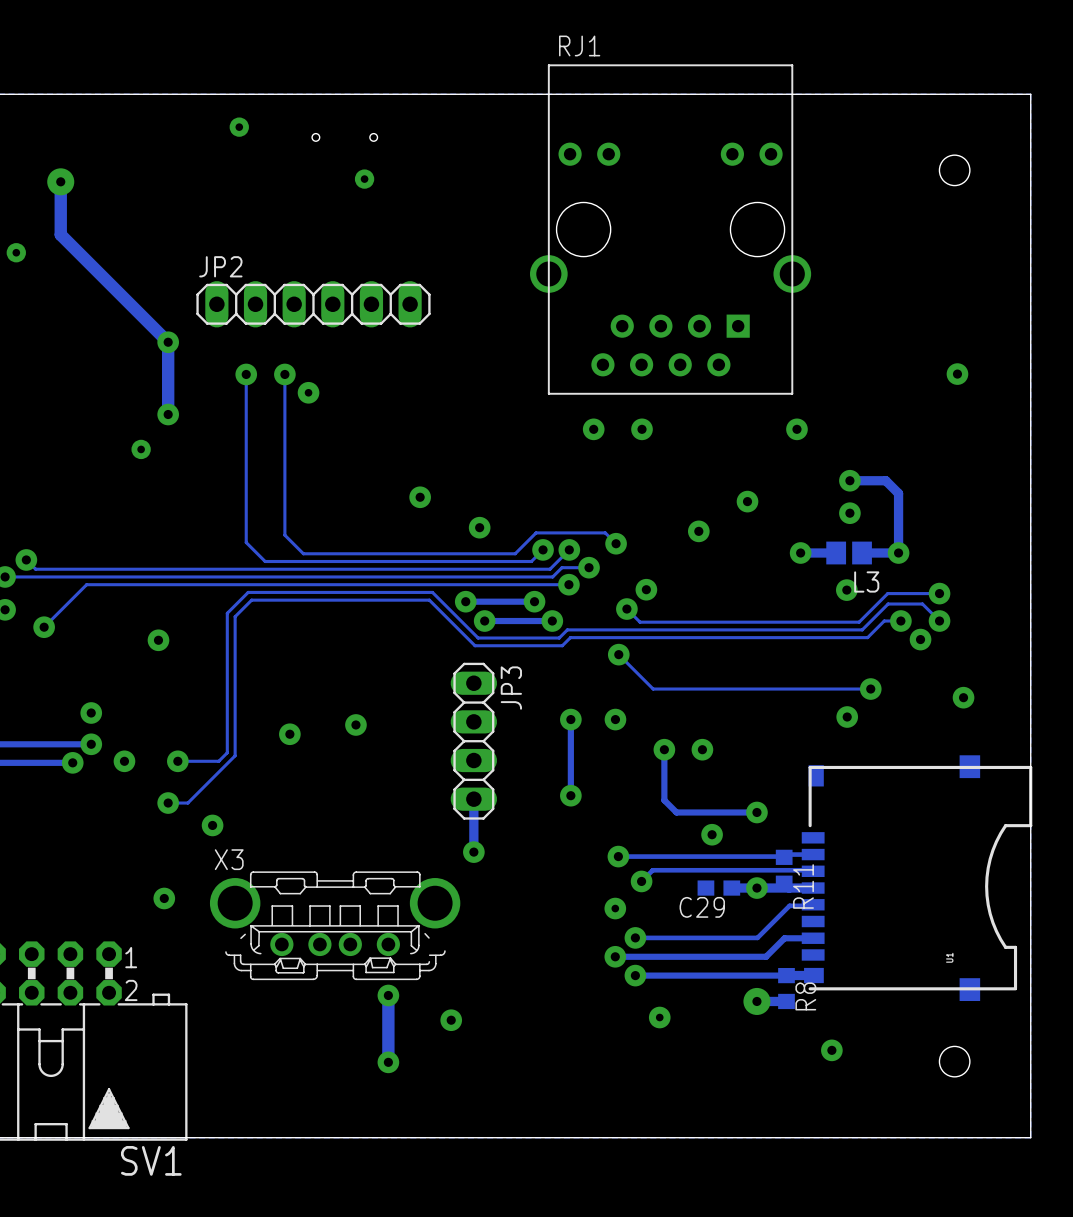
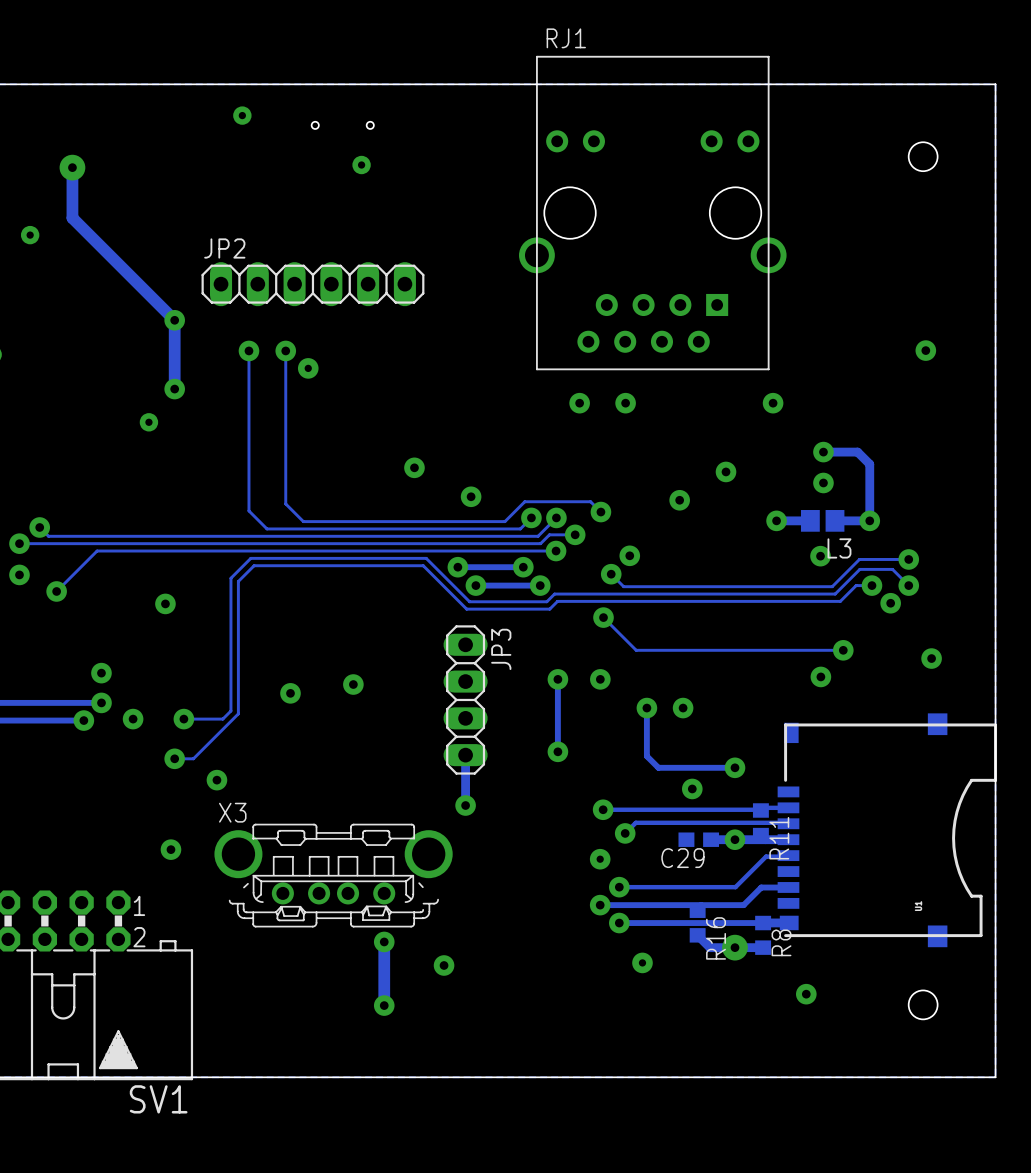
R16: none -> (697, 923)
track: none -> (697, 935) (709, 947) (734, 947)

